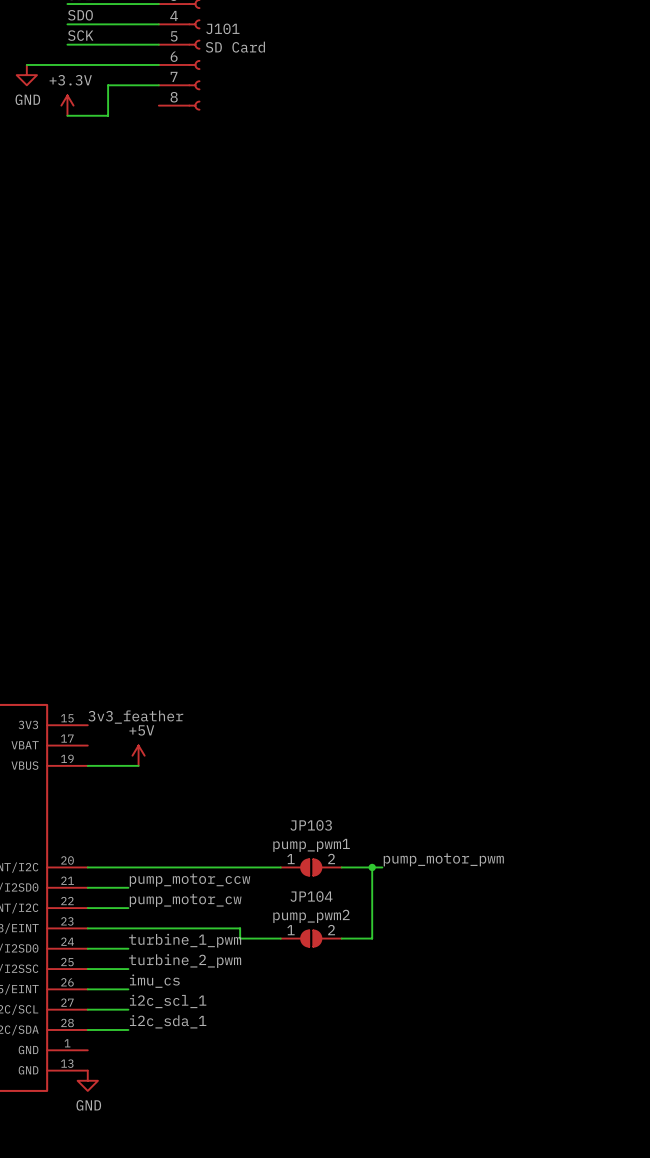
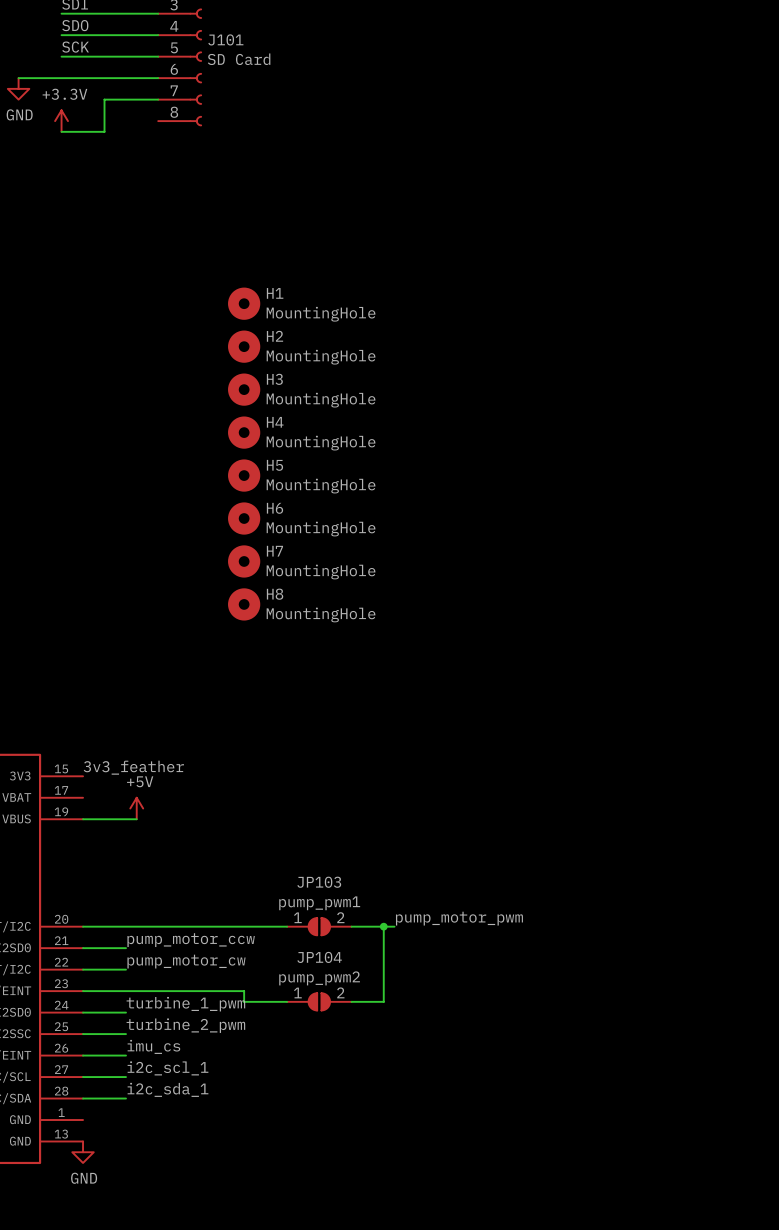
H1: none -> MountingHole (244, 303)
H2: none -> MountingHole (244, 346)
H3: none -> MountingHole (244, 389)
H4: none -> MountingHole (244, 432)
H5: none -> MountingHole (244, 475)
H6: none -> MountingHole (244, 518)
H7: none -> MountingHole (244, 561)
H8: none -> MountingHole (244, 604)

